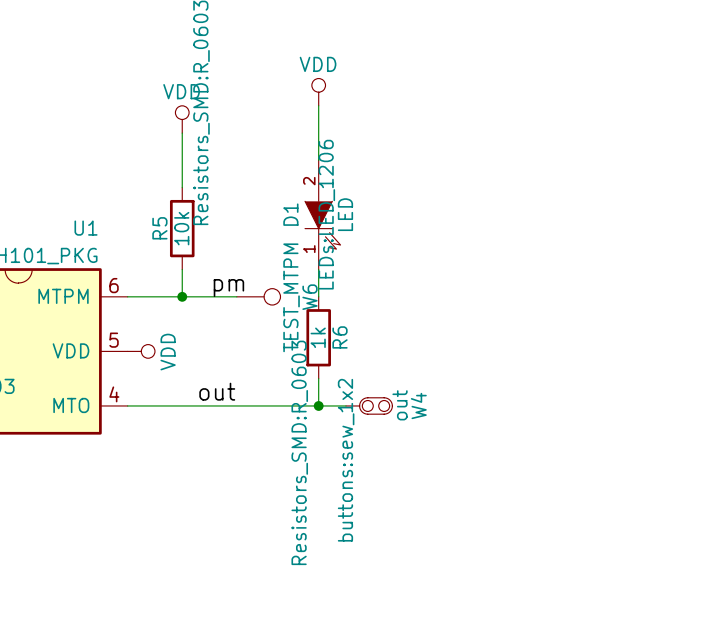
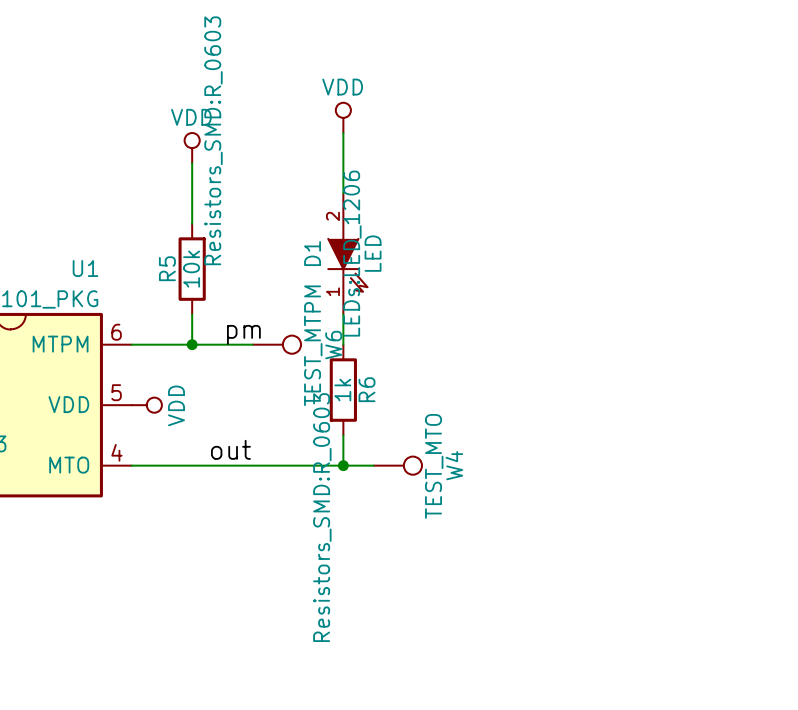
W4 symbol: [345, 397, 393, 415] -> [373, 456, 422, 475]
W4 value: out (400, 405) -> TEST_MTO (434, 466)
W4 text: buttons:sew_1x2 (346, 460) -> none

